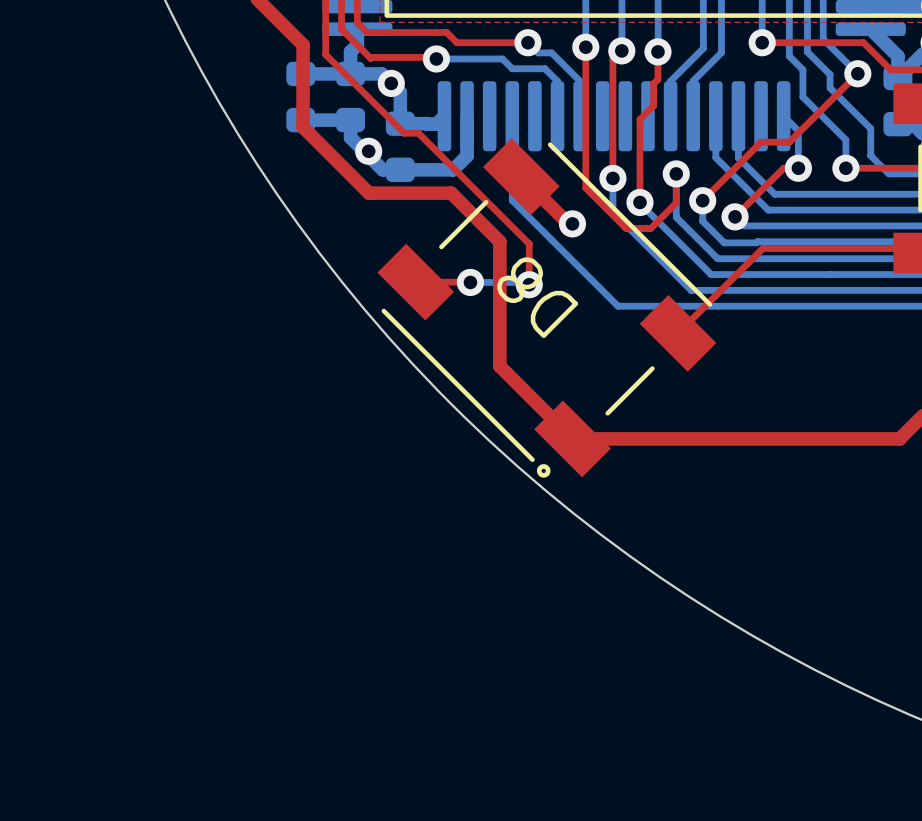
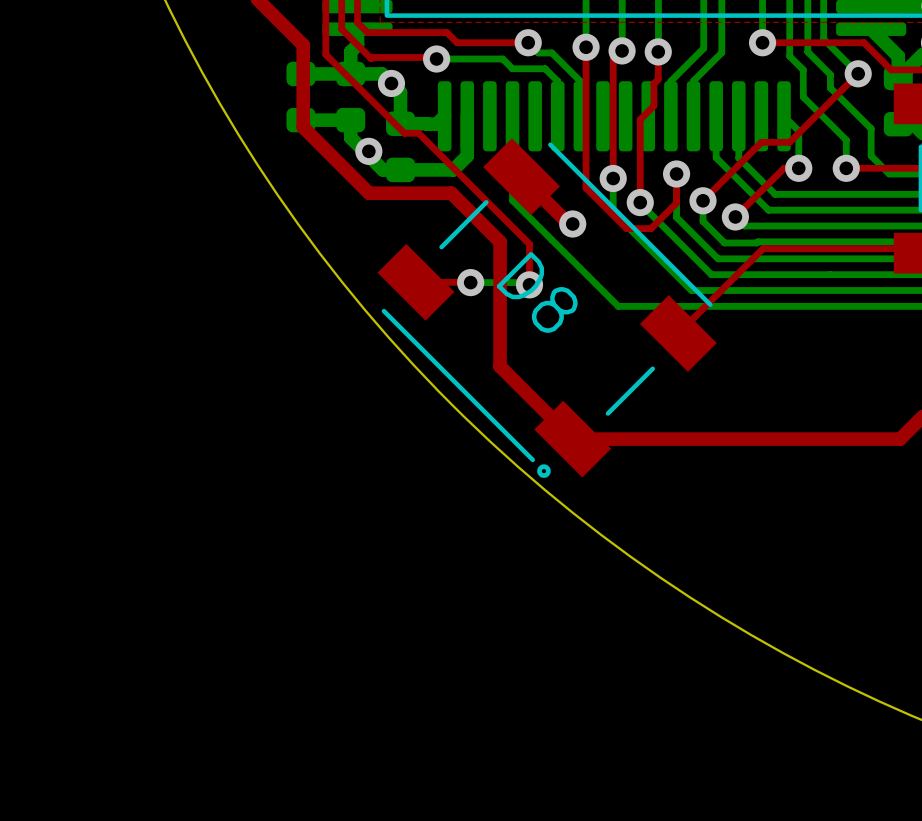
D8 name rotation: 0° (537, 297) -> 180° (537, 292)

